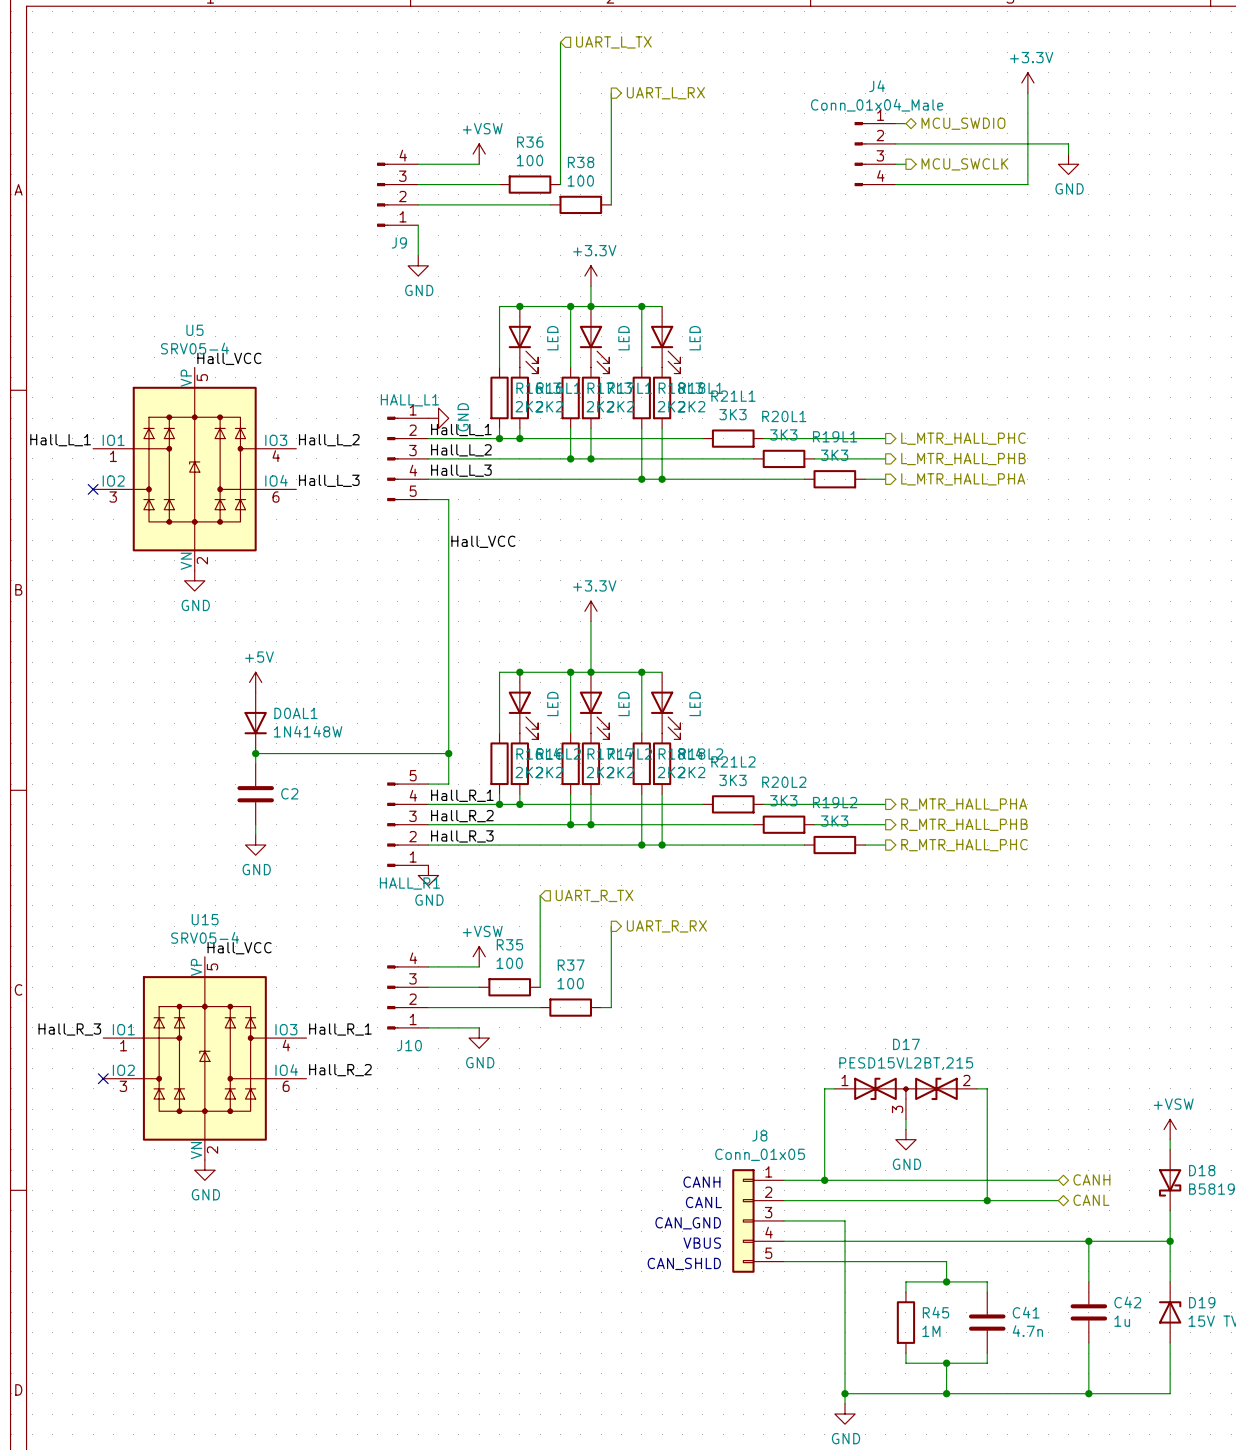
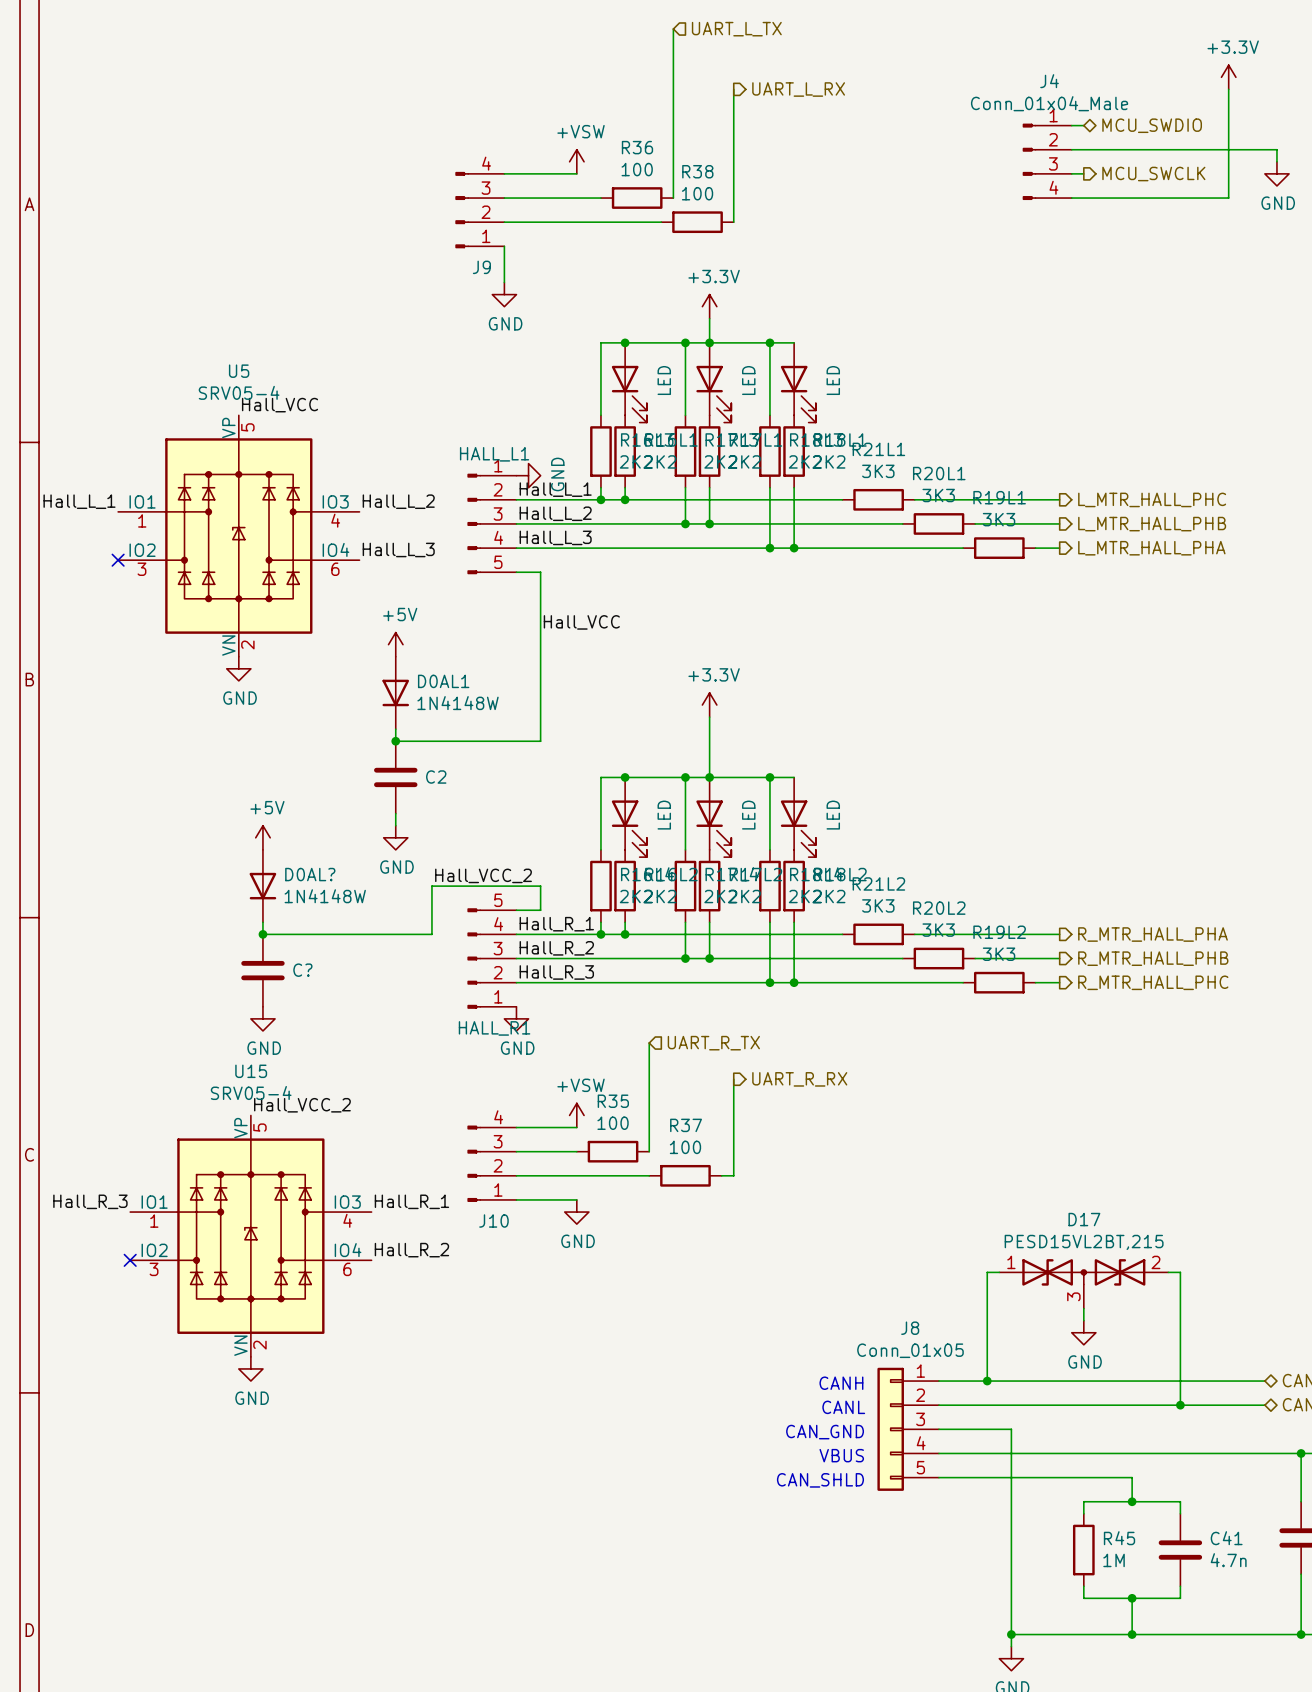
power symbol: none -> +5V (395, 644)
junction: none -> (395, 741)
wire: (448, 641) (448, 763) -> (540, 741) (395, 741) (395, 729)
power symbol position: +5V (255, 682) -> +5V (262, 837)
D0AL1 position: (255, 723) -> (395, 692)
power symbol: none -> GND (395, 837)
junction: (255, 753) -> none
wire: (448, 753) (255, 753) (255, 763) -> none
junction: (448, 753) -> none
label: none -> Hall_VCC_2 (483, 875)
D0AL?: none -> 1N4148W (262, 886)
wire: none -> (540, 886) (431, 886) (431, 934) (262, 934) (262, 922)
C2 position: (255, 794) -> (395, 777)
junction: none -> (262, 934)
wire: (255, 824) (255, 834) -> (395, 813) (395, 825)
C?: none -> (262, 970)
power symbol position: GND (255, 845) -> GND (262, 1018)
label: Hall_VCC (239, 948) -> Hall_VCC_2 (302, 1105)

